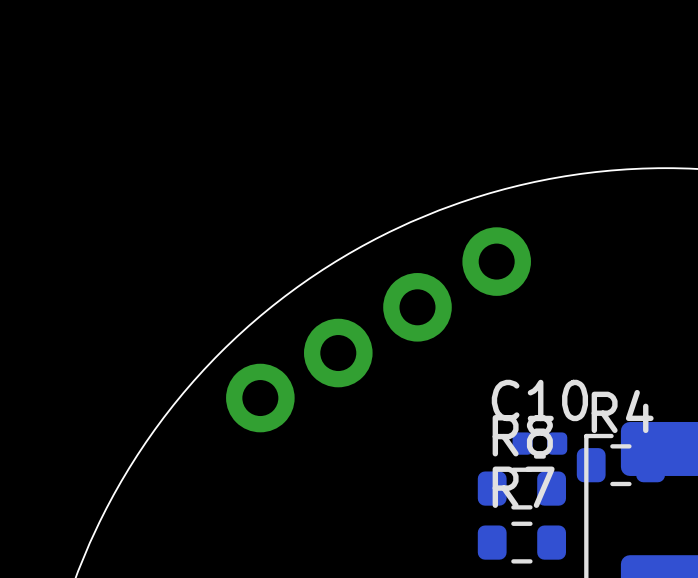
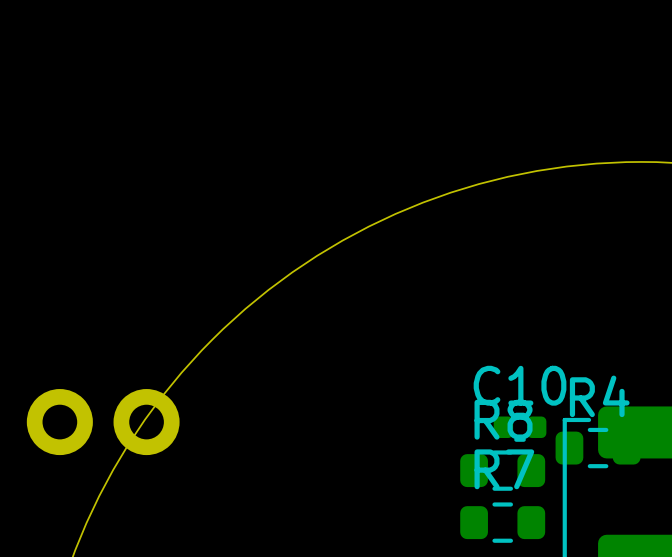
part: (378, 329) -> none
part: none -> (103, 422)

